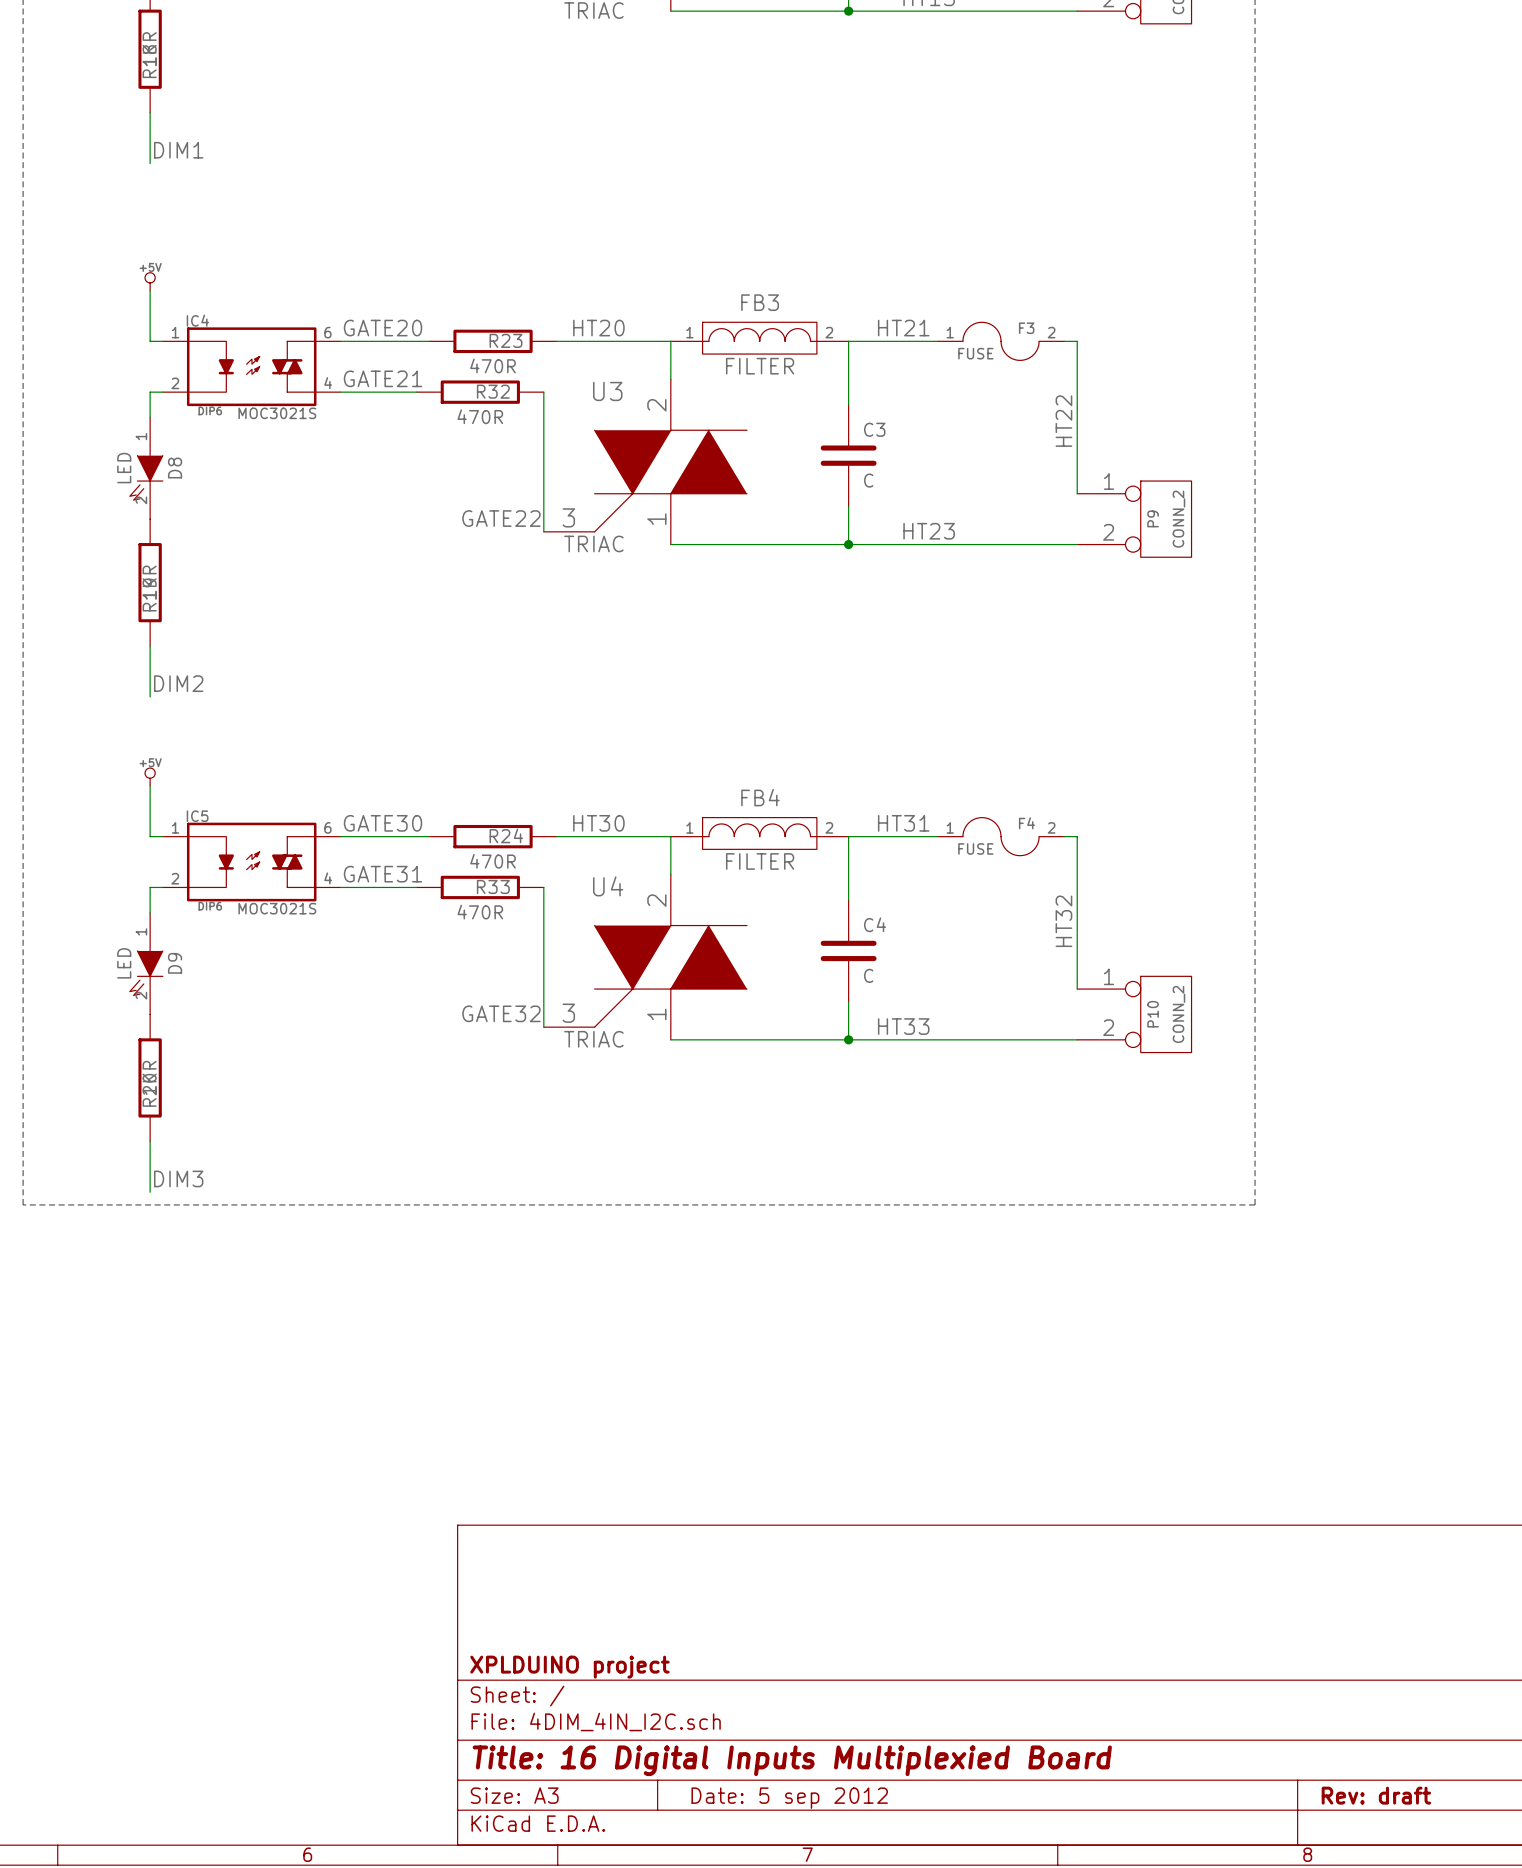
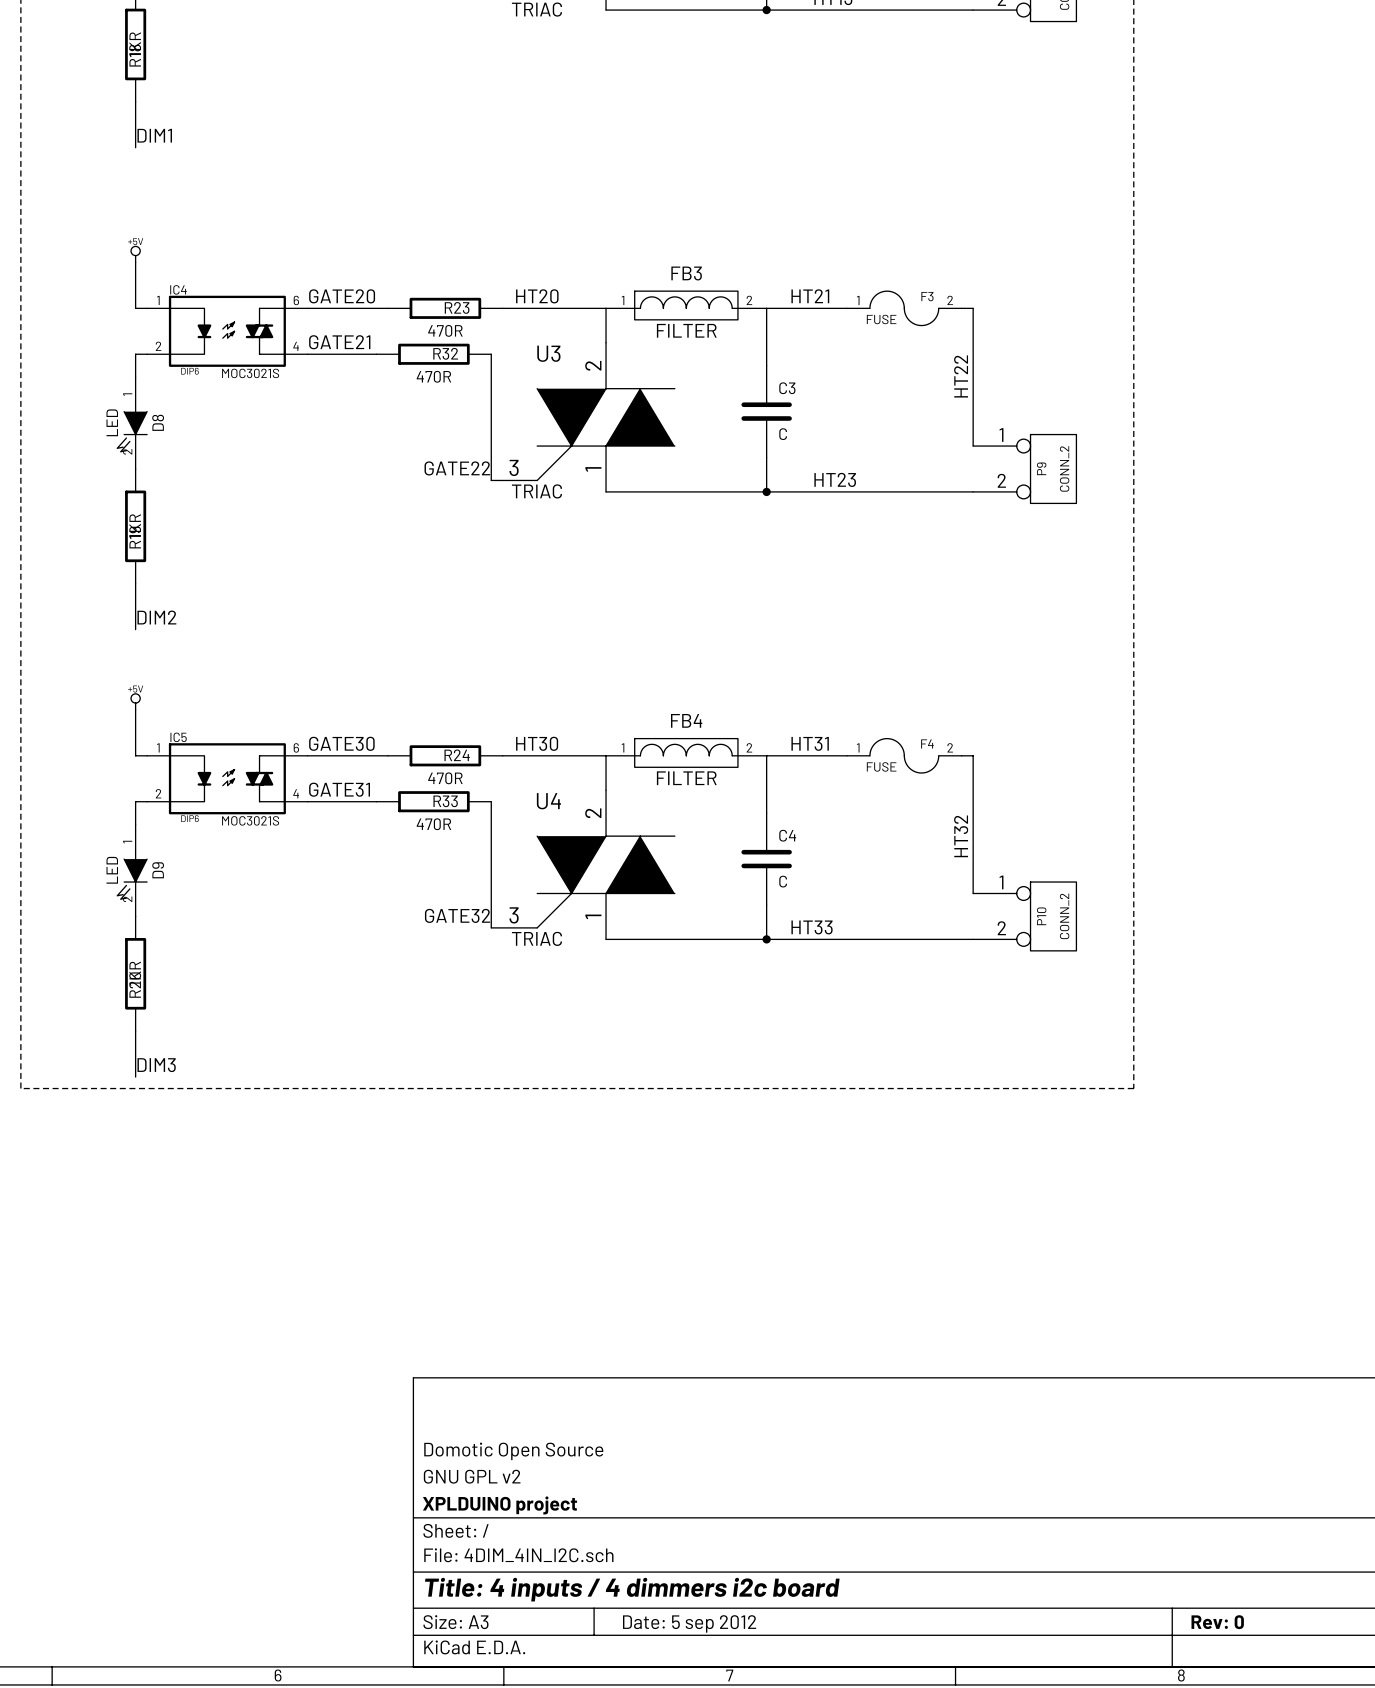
title block: none -> Domotic Open Source (513, 1451)
title block: none -> GNU GPL v2 (472, 1476)
title block: Title: 16 Digital Inputs Multiplexied Board (792, 1760) -> Title: 4 inputs / 4 dimmers i2c board (632, 1589)
title block: Rev: draft (1376, 1795) -> Rev: 0 (1217, 1622)

